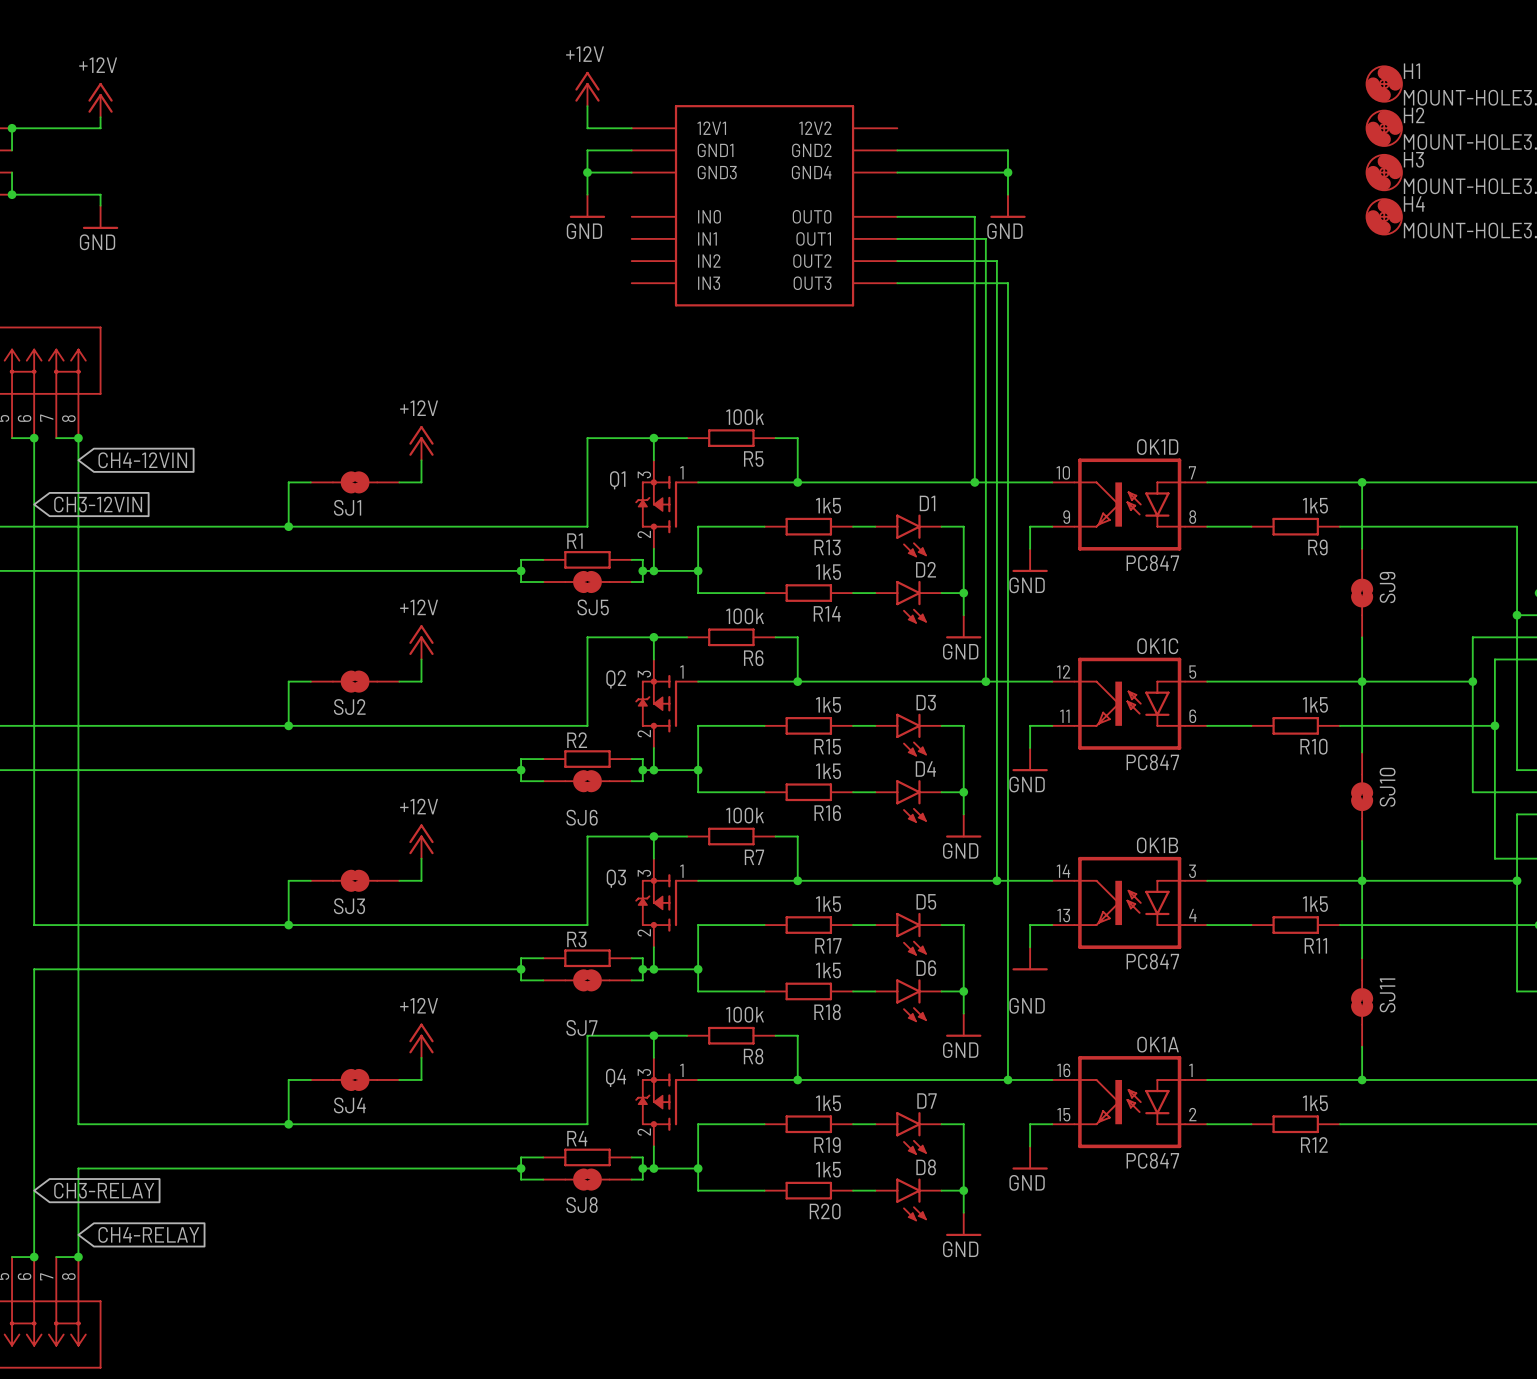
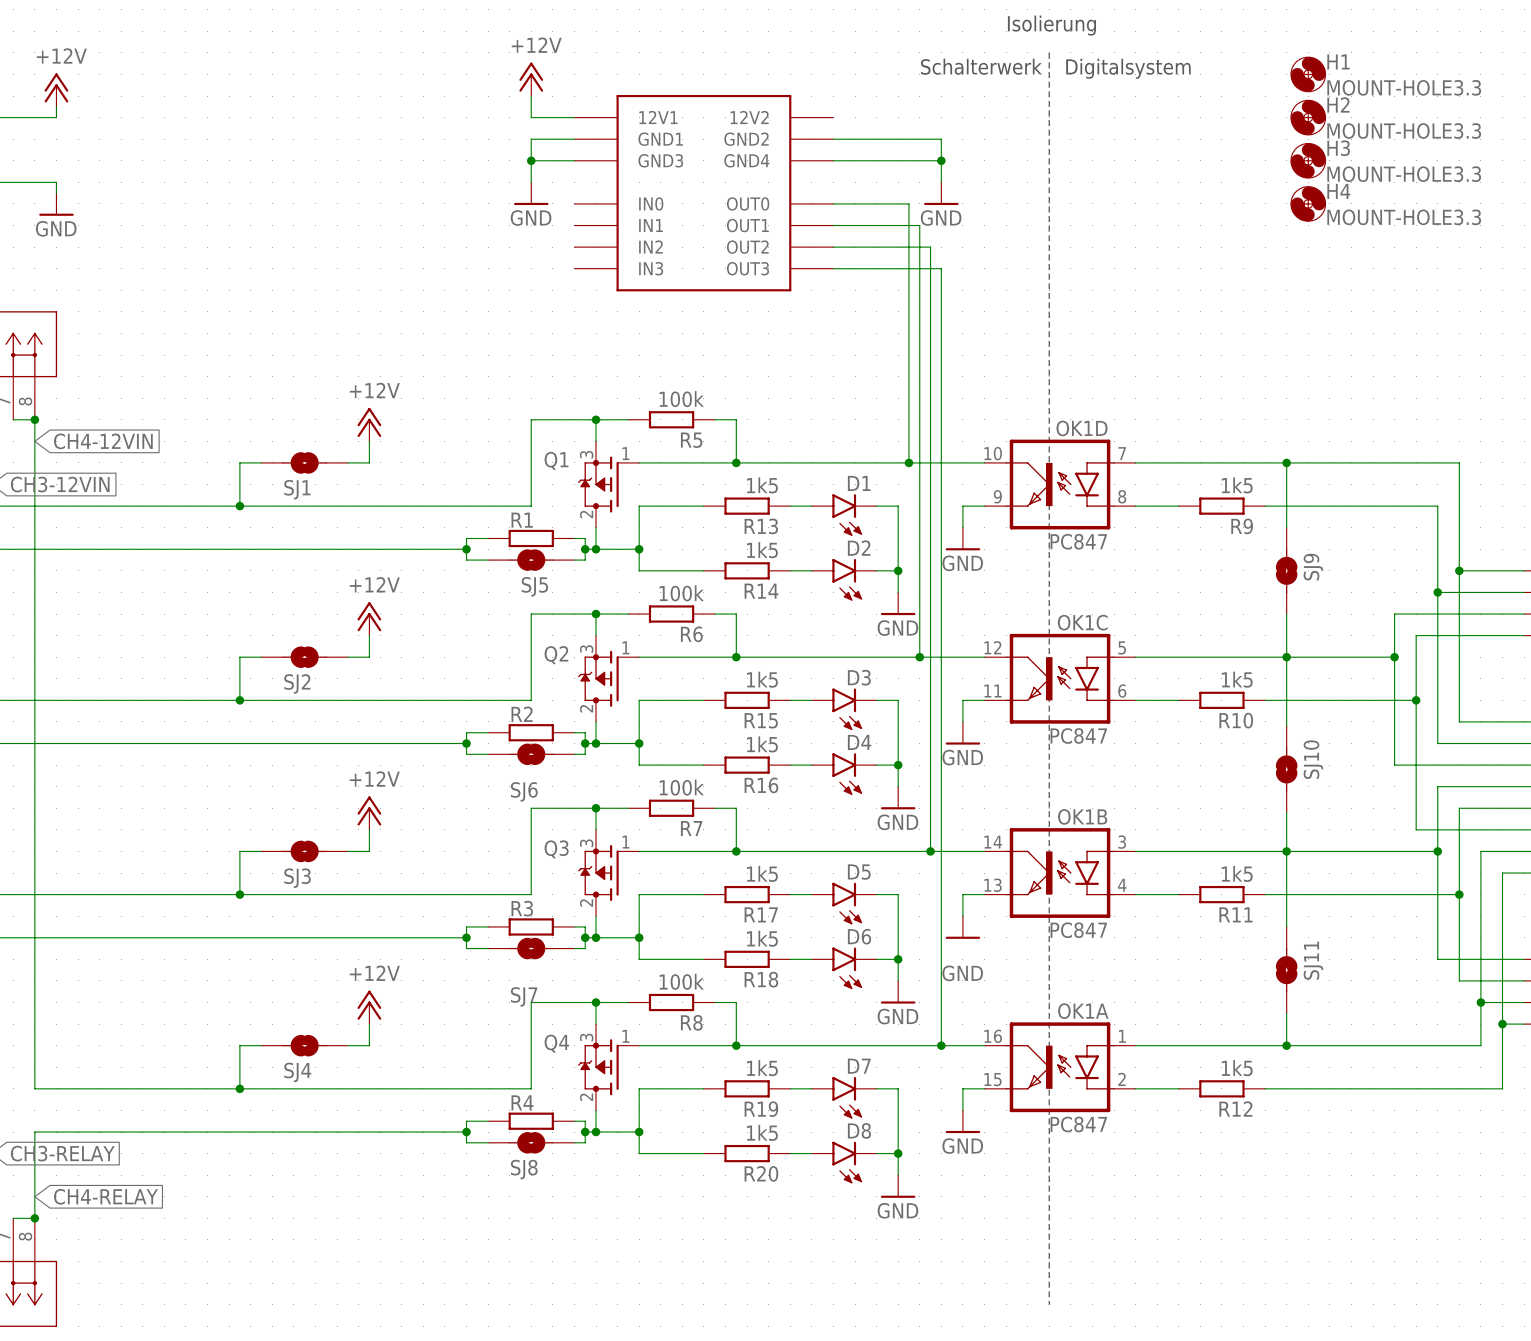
text: none -> Isolierung (1051, 25)
line: none -> (1049, 52) (1049, 1304)
text: none -> Schalterwerk (981, 66)
text: none -> Digitalsystem (1128, 68)

